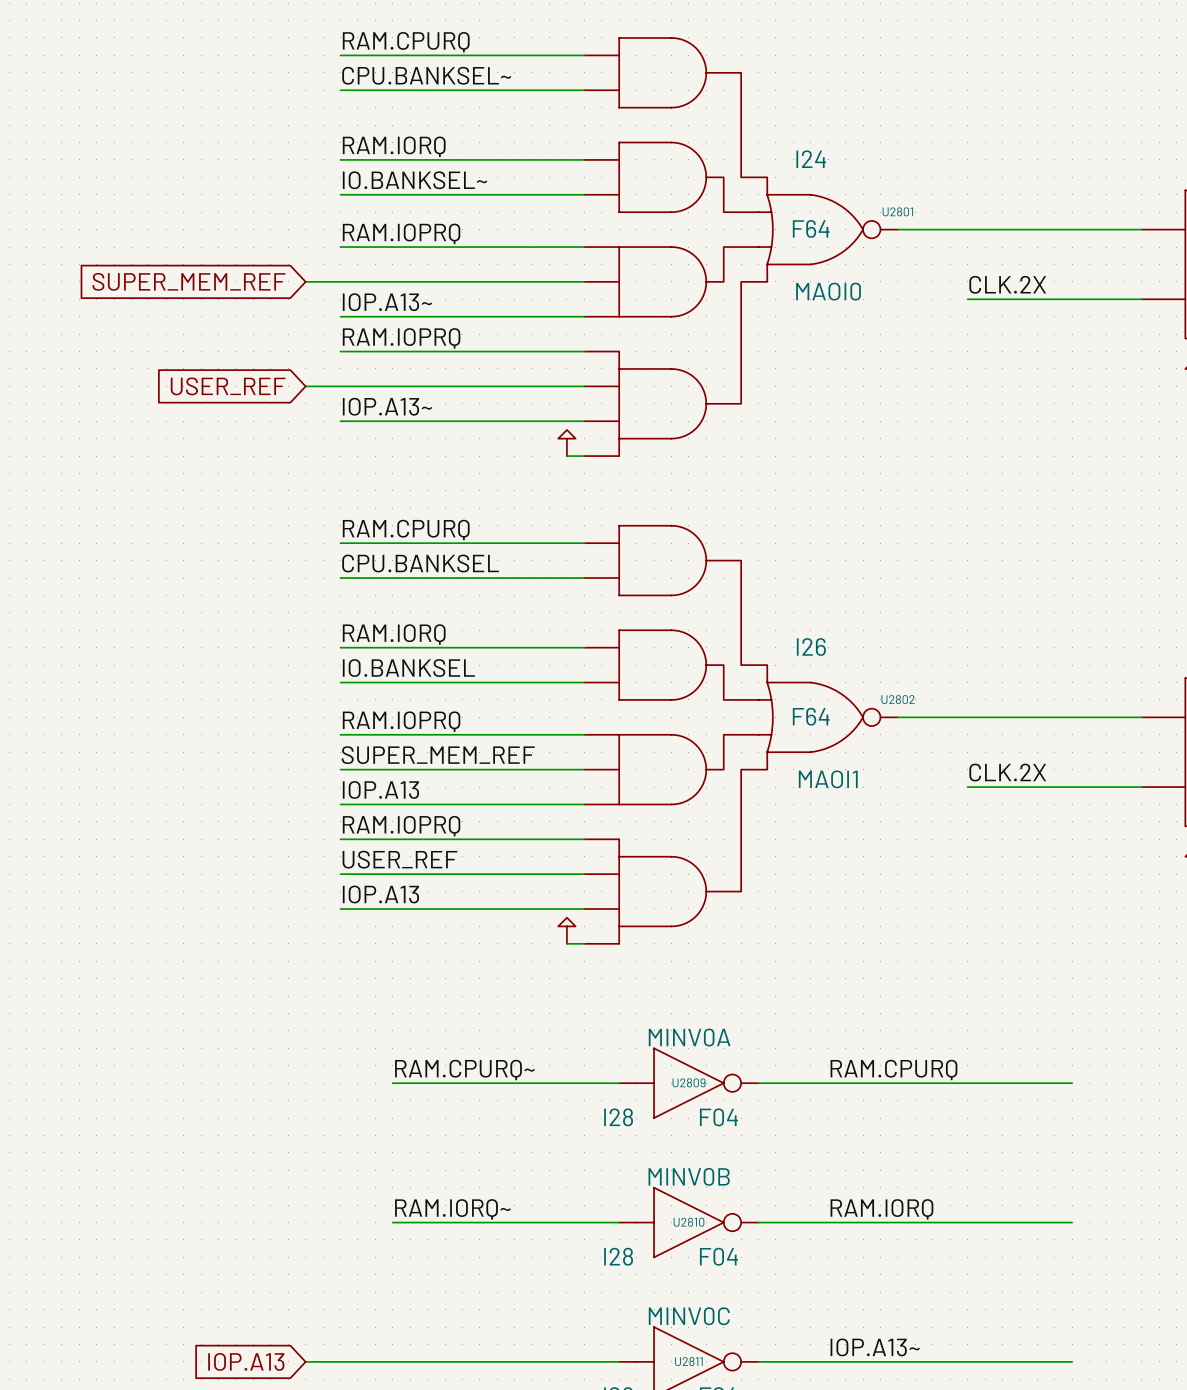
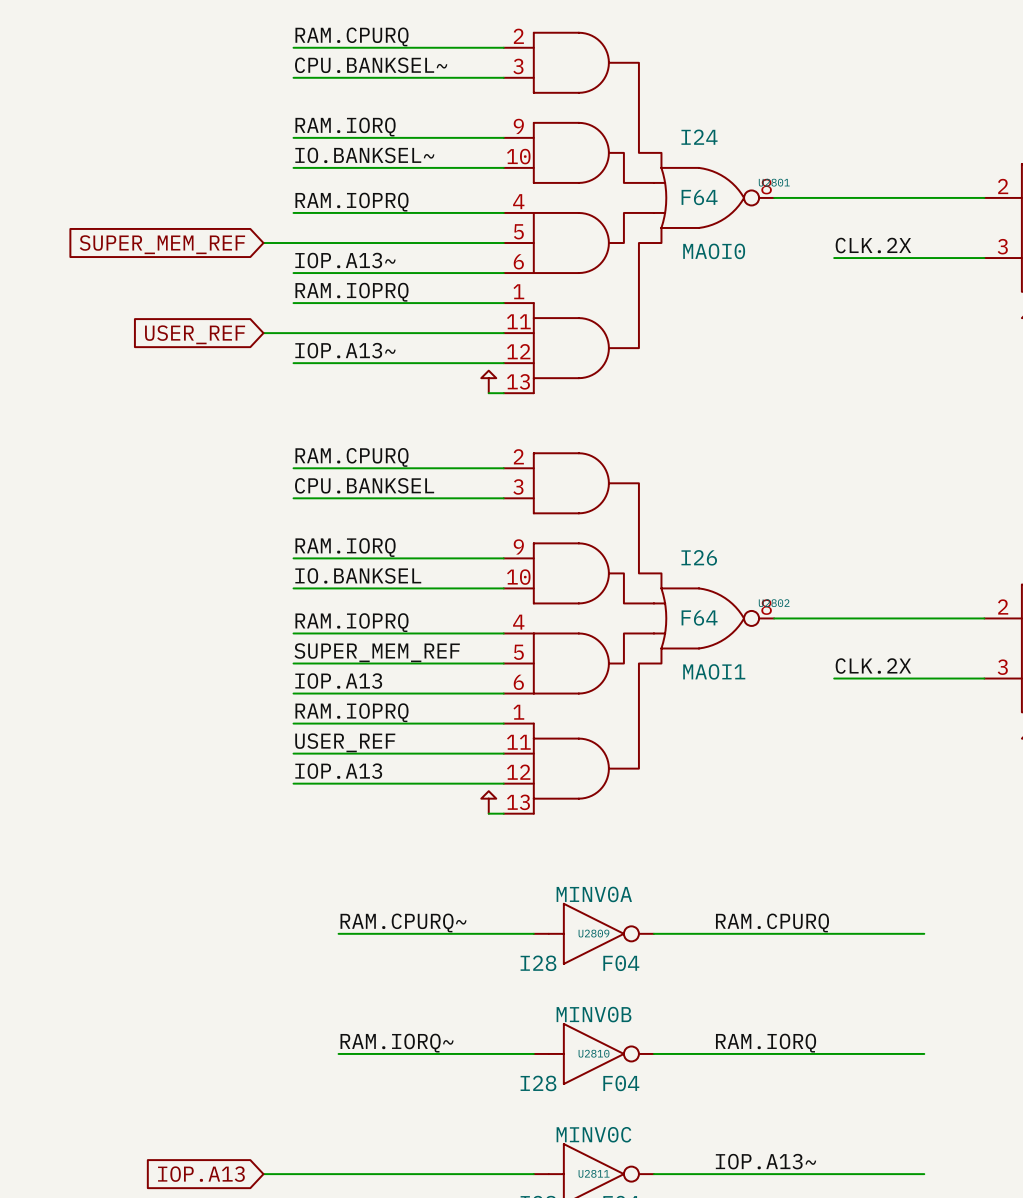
U2801 symbol: [584, 37, 898, 457] -> [503, 32, 775, 394]
part pin number: none -> 2 (1003, 186)
part pin number: none -> 3 (1002, 246)
U2802 symbol: [584, 525, 898, 945] -> [503, 452, 775, 815]
part pin number: none -> 2 (1003, 606)
part pin number: none -> 3 (1002, 667)

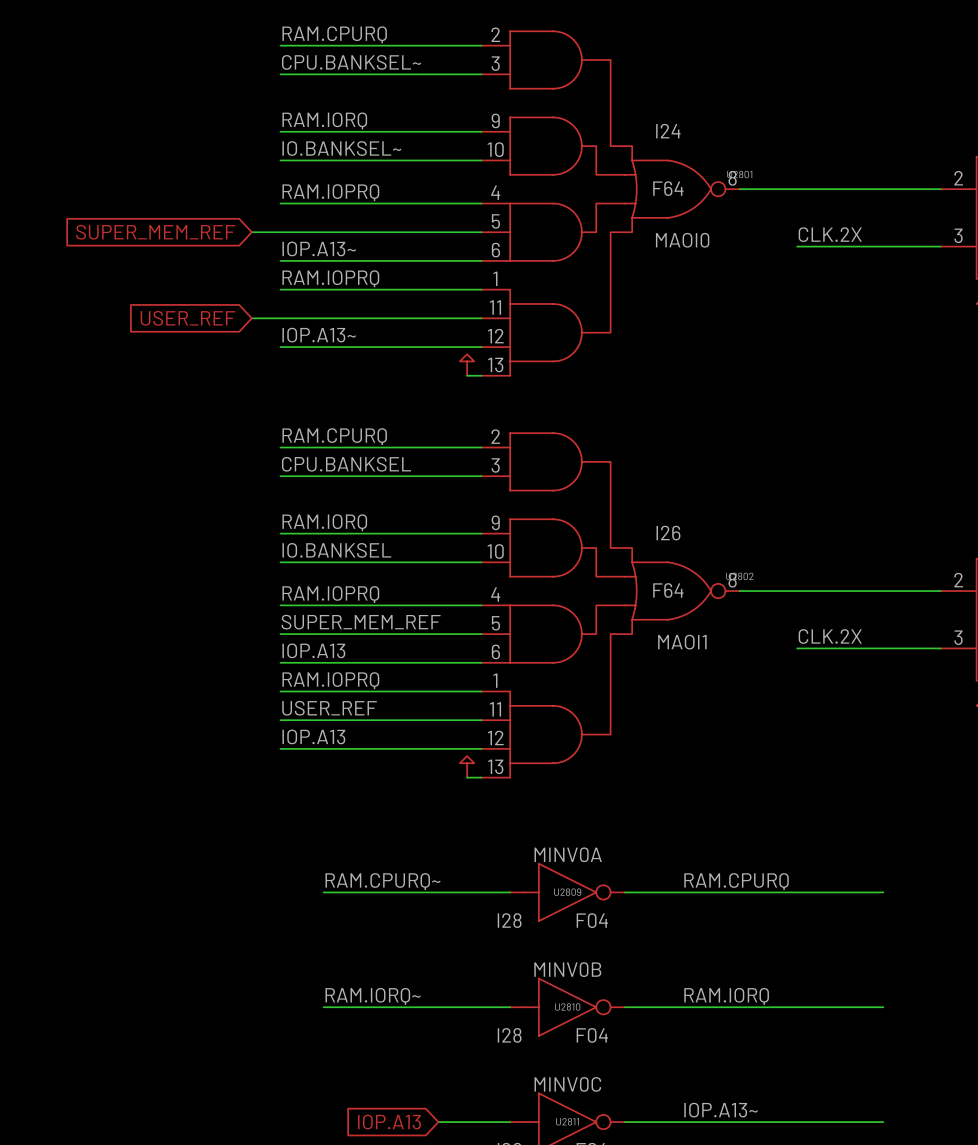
global label: IOP.A13 (201, 1174) -> none
wire: (263, 1174) (458, 1174) -> none
global label: none -> IOP.A13 (389, 1122)

